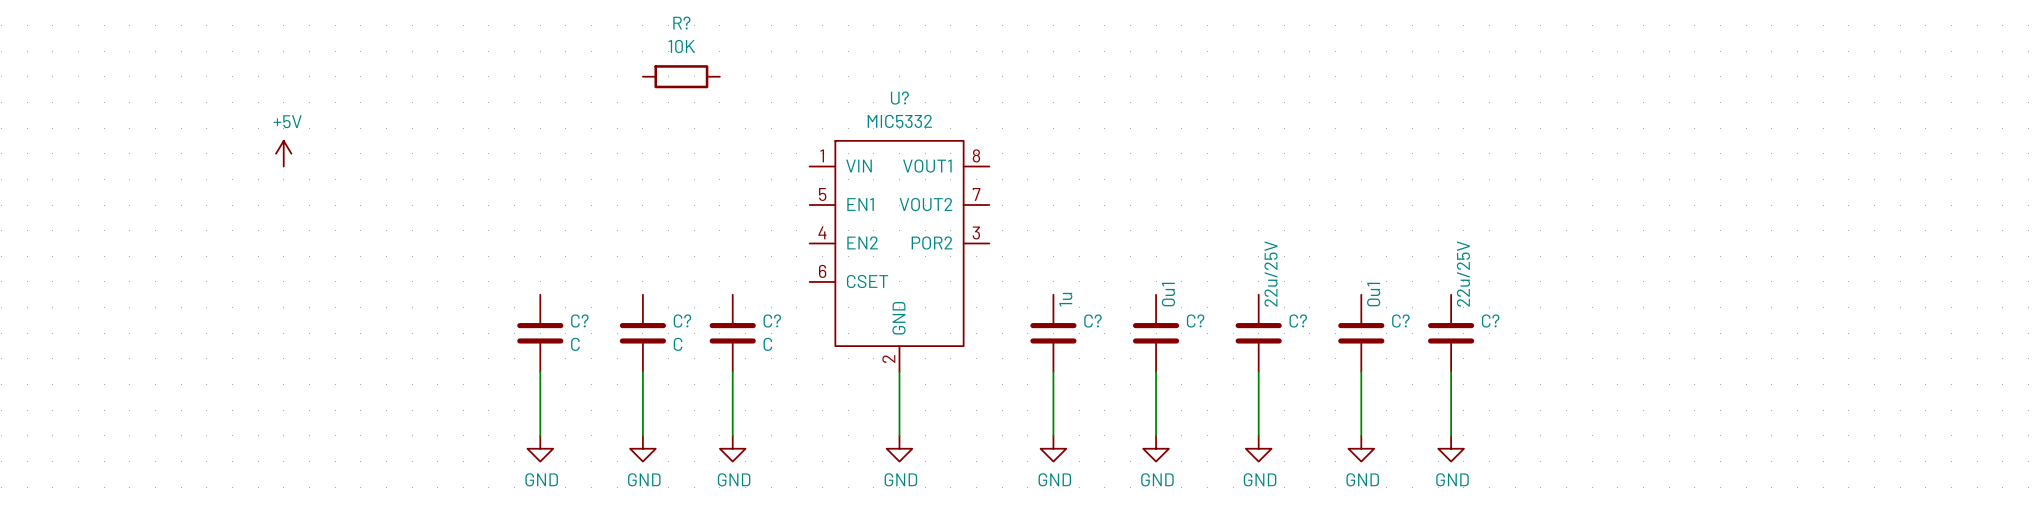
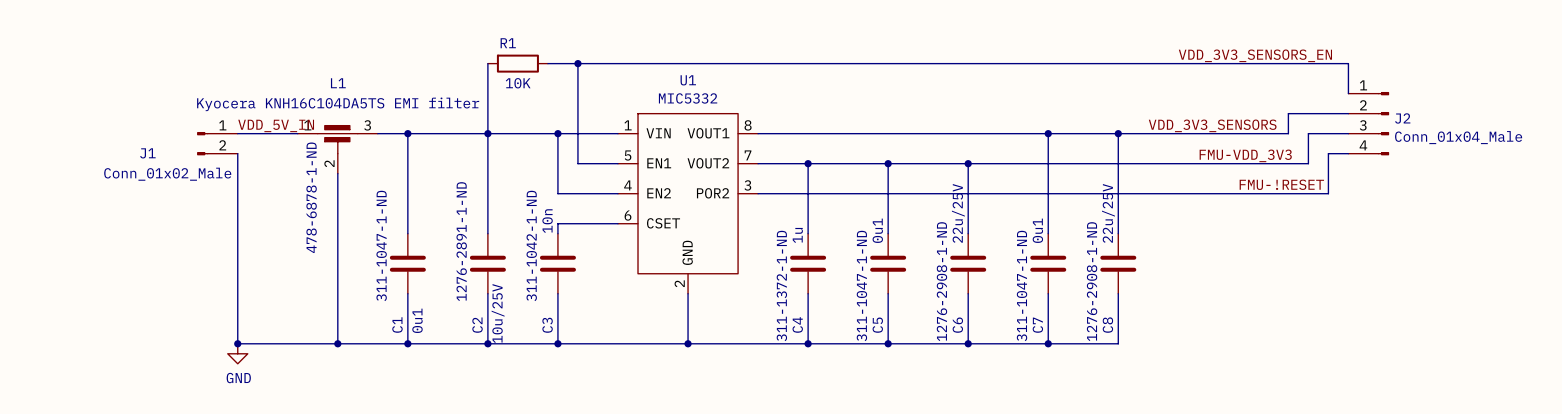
R? name: R? (681, 23) -> R1 (508, 43)
R? value position: 10K (681, 46) -> 10K (518, 83)
label: none -> VDD_3V3_SENSORS_EN (1255, 55)
wire: none -> (487, 63) (487, 233)
wire: none -> (547, 63) (1348, 63) (1348, 93)
wire: none -> (577, 63) (577, 163) (617, 163)
junction: none -> (577, 63)
U? name: U? (899, 98) -> U1 (688, 80)
wire: none -> (1348, 113) (1288, 113) (1288, 133) (758, 133)
power symbol: +5V (283, 153) -> none
J2: none -> Conn_01x04_Male (1368, 123)
label: none -> VDD_5V_IN (276, 125)
label: none -> VDD_3V3_SENSORS (1212, 125)
wire: none -> (237, 133) (297, 133)
wire: none -> (377, 133) (617, 133)
wire: none -> (407, 133) (407, 233)
junction: none -> (407, 133)
junction: none -> (487, 133)
wire: none -> (557, 133) (557, 193) (617, 193)
junction: none -> (557, 133)
wire: none -> (1048, 133) (1048, 233)
junction: none -> (1048, 133)
wire: none -> (1118, 133) (1118, 233)
junction: none -> (1118, 133)
wire: none -> (1348, 133) (1308, 133) (1308, 163) (758, 163)
J1: none -> Conn_01x02_Male (217, 143)
L1: none -> Kyocera KNH16C104DA5TS EMI filter (337, 149)
wire: none -> (237, 153) (237, 343) (1118, 343)
wire: none -> (1348, 153) (1328, 153) (1328, 193) (758, 193)
label: none -> FMU-VDD_3V3 (1245, 155)
wire: none -> (808, 163) (808, 233)
junction: none -> (808, 163)
wire: none -> (888, 163) (888, 233)
junction: none -> (888, 163)
wire: none -> (968, 163) (968, 233)
junction: none -> (968, 163)
wire: none -> (337, 173) (337, 343)
label: none -> FMU-!RESET (1281, 184)
text: none -> 478-6878-1-ND (311, 197)
C? value position: 22u/25V (1271, 273) -> 22u/25V (958, 213)
C? value position: 22u/25V (1463, 273) -> 22u/25V (1108, 213)
wire: none -> (617, 223) (557, 223) (557, 233)
C? value position: 0u1 (1168, 294) -> 0u1 (877, 230)
C? value position: 0u1 (1373, 294) -> 0u1 (1037, 230)
C? value position: 1u (1065, 299) -> 1u (797, 235)
C? name: C? (579, 321) -> C1 (397, 325)
text: none -> 1276-2891-1-ND (461, 241)
C? name: C? (682, 321) -> C2 (477, 325)
C? name: C? (772, 321) -> C3 (547, 325)
C? name: C? (1092, 321) -> C4 (797, 324)
C? name: C? (1195, 321) -> C5 (877, 325)
C? name: C? (1298, 321) -> C6 (957, 325)
C? name: C? (1400, 321) -> C7 (1037, 325)
C? name: C? (1490, 321) -> C8 (1107, 325)
text: none -> 311-1042-1-ND (531, 245)
text: none -> 311-1047-1-ND (381, 245)
C? value: C (575, 344) -> 0u1 (417, 320)
C? value: C (678, 344) -> 10u/25V (498, 313)
C? value: C (767, 344) -> 10n (547, 221)
text: none -> 1276-2908-1-ND (941, 281)
text: none -> 1276-2908-1-ND (1092, 281)
text: none -> 311-1047-1-ND (861, 285)
text: none -> 311-1047-1-ND (1022, 285)
text: none -> 311-1372-1-ND (781, 285)
junction: none -> (237, 343)
junction: none -> (337, 343)
junction: none -> (407, 343)
junction: none -> (487, 343)
junction: none -> (557, 343)
junction: none -> (688, 343)
junction: none -> (808, 343)
junction: none -> (888, 343)
junction: none -> (968, 343)
junction: none -> (1048, 343)
power symbol: none -> GND (237, 353)
power symbol: GND (540, 448) -> none
power symbol: GND (642, 448) -> none
power symbol: GND (732, 448) -> none
power symbol: GND (899, 448) -> none
power symbol: GND (1053, 448) -> none
power symbol: GND (1156, 448) -> none
power symbol: GND (1258, 448) -> none
power symbol: GND (1361, 448) -> none
power symbol: GND (1451, 448) -> none

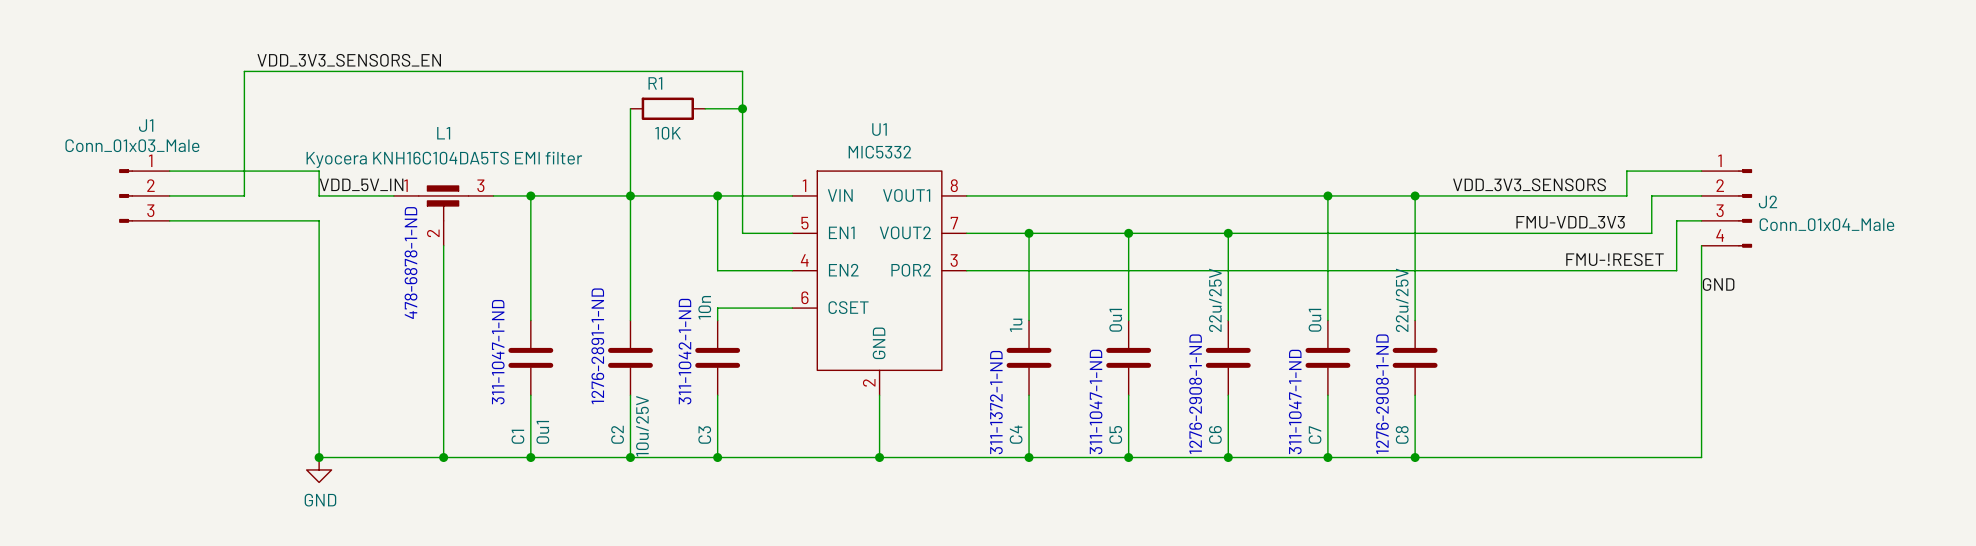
label: none -> VDD_3V3_SENSORS_EN (349, 60)
label: VDD_3V3_SENSORS_EN (1255, 55) -> none
wire: (577, 63) (1348, 63) (1348, 93) -> (742, 108) (742, 71) (244, 71) (244, 195) (169, 195)
wire: none -> (169, 171) (319, 171) (319, 195)
J2 position: (1368, 123) -> (1726, 208)
J1 symbol: [197, 132, 238, 156] -> [119, 169, 170, 223]
wire: none -> (169, 220) (319, 220)
J1 name position: J1 (147, 153) -> J1 (146, 125)
wire: none -> (1701, 245) (1701, 457) (1415, 457)
J1 value: Conn_01x02_Male (167, 174) -> Conn_01x03_Male (132, 145)
label: none -> GND (1718, 284)
junction: none -> (1415, 457)

